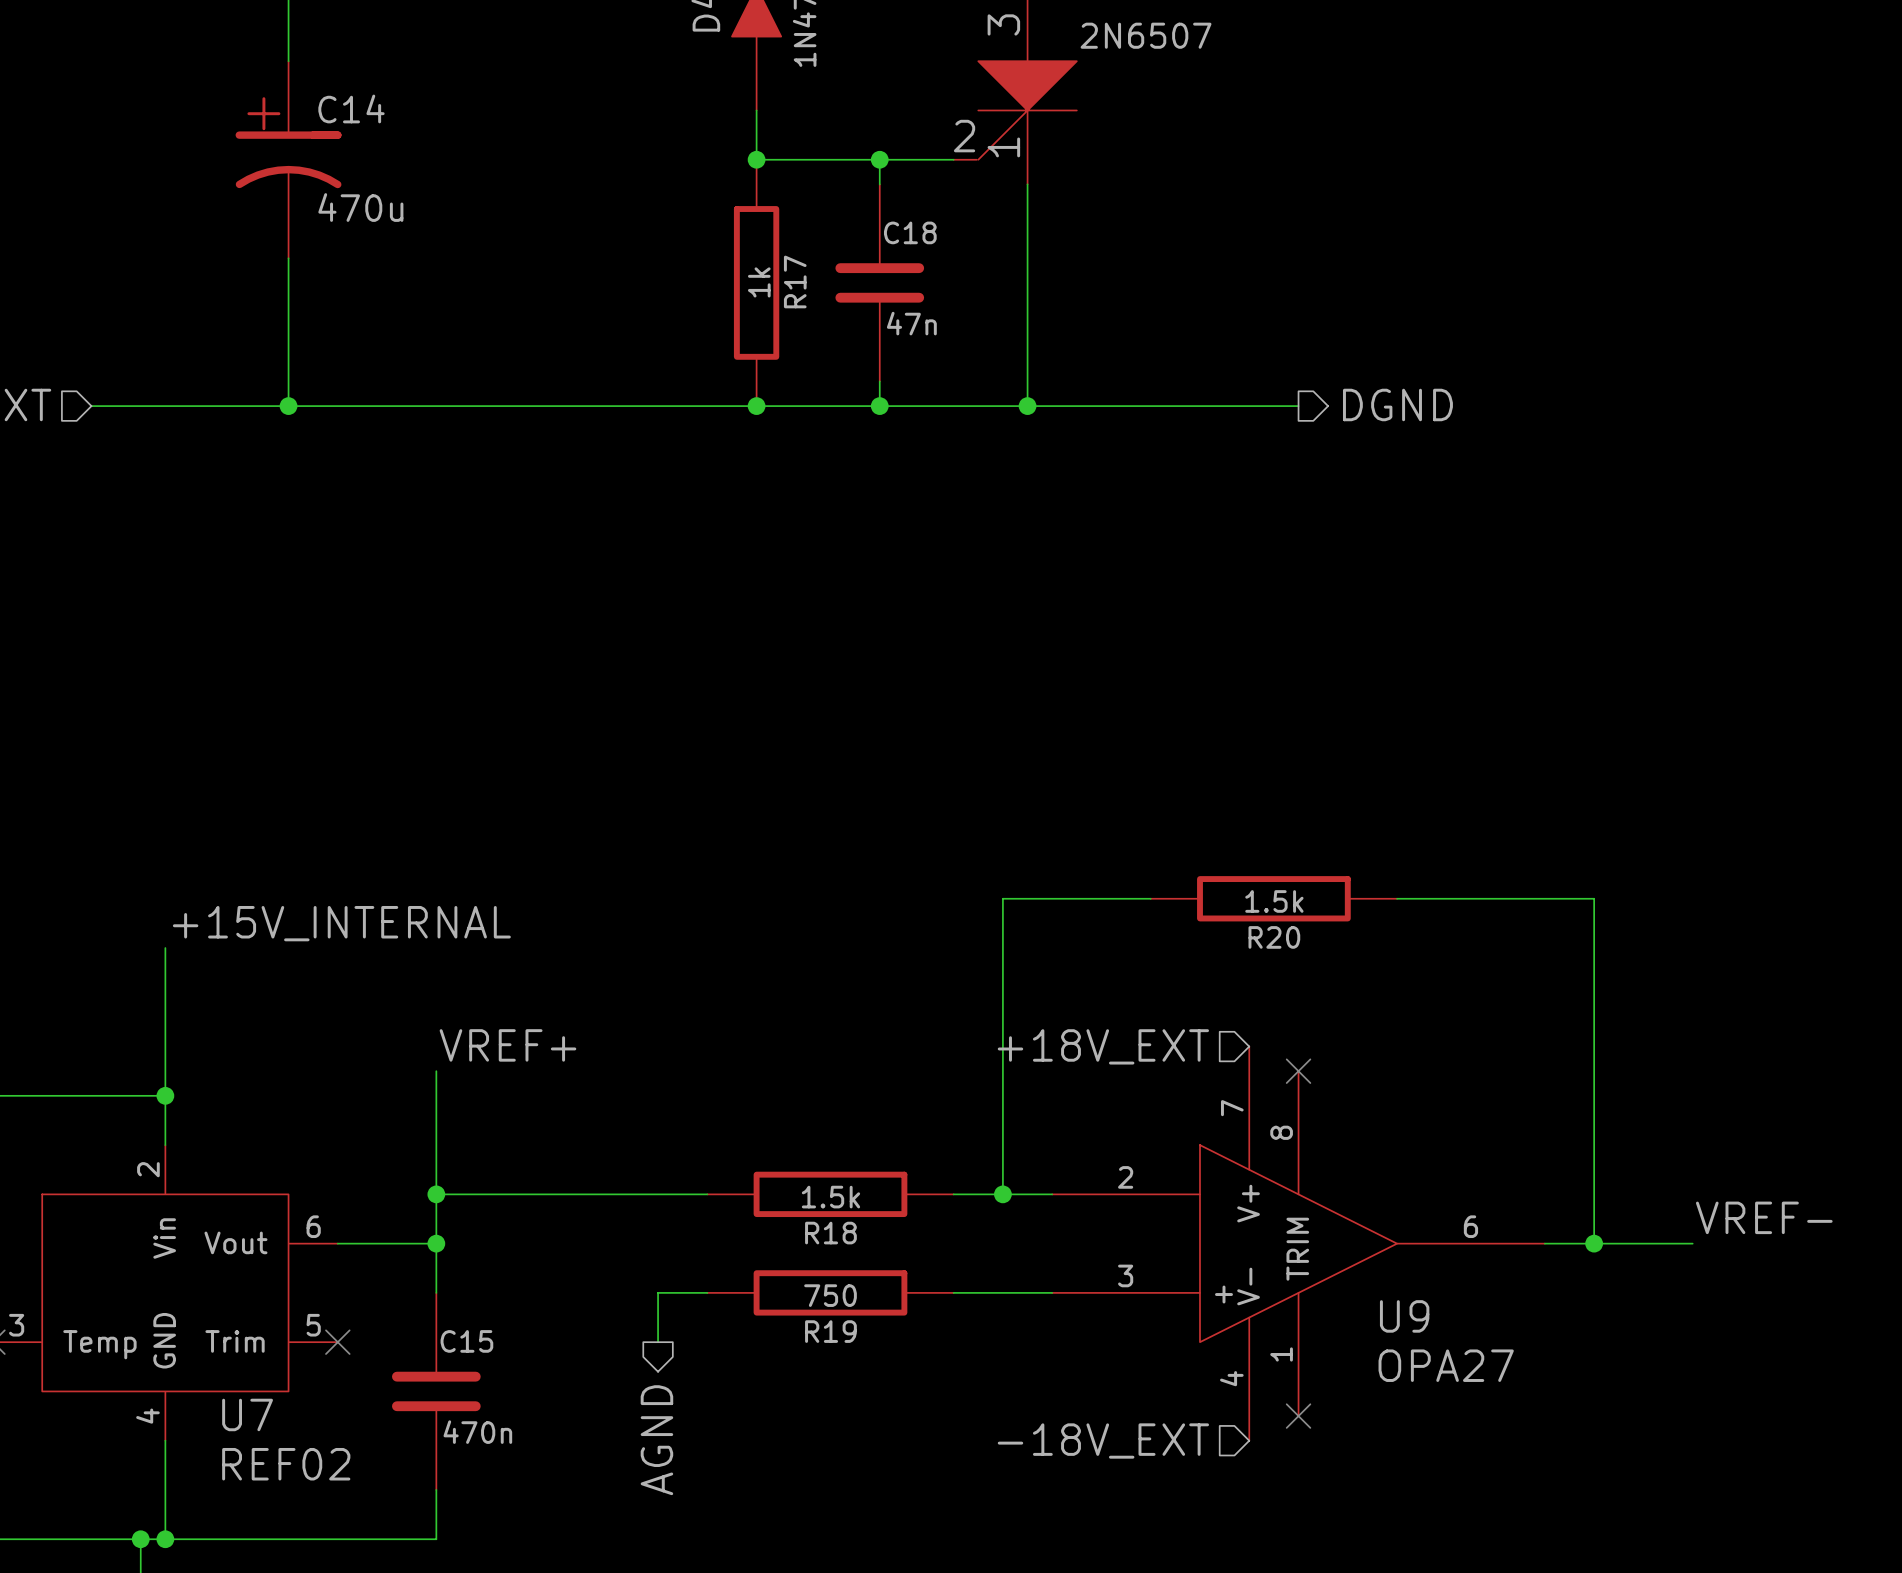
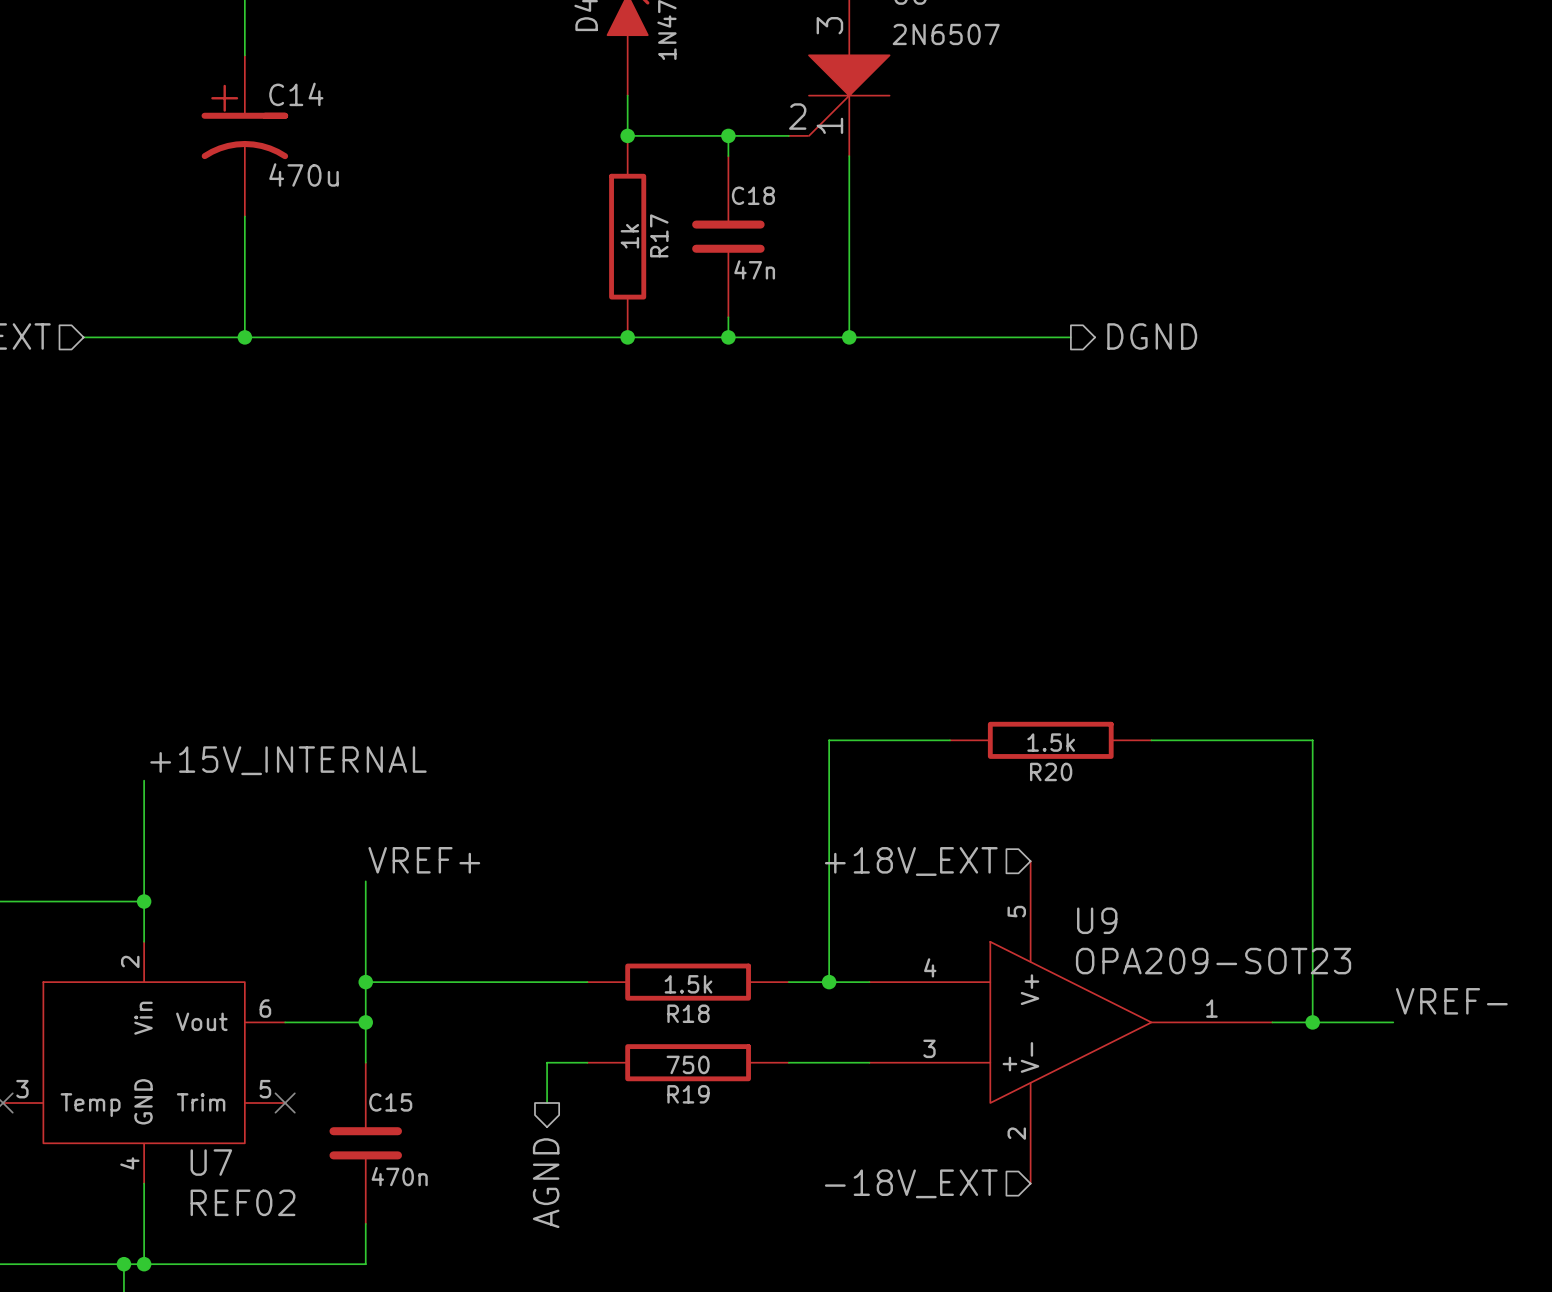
U9 symbol: [1052, 1046, 1545, 1441] -> [869, 861, 1273, 1184]
no-connect mark: (1298, 1071) -> none
U9 name position: U9 (1404, 1316) -> U9 (1097, 920)
U9 value: OPA27 (1446, 1365) -> OPA209-SOT23 (1213, 961)
no-connect mark: (1298, 1416) -> none

